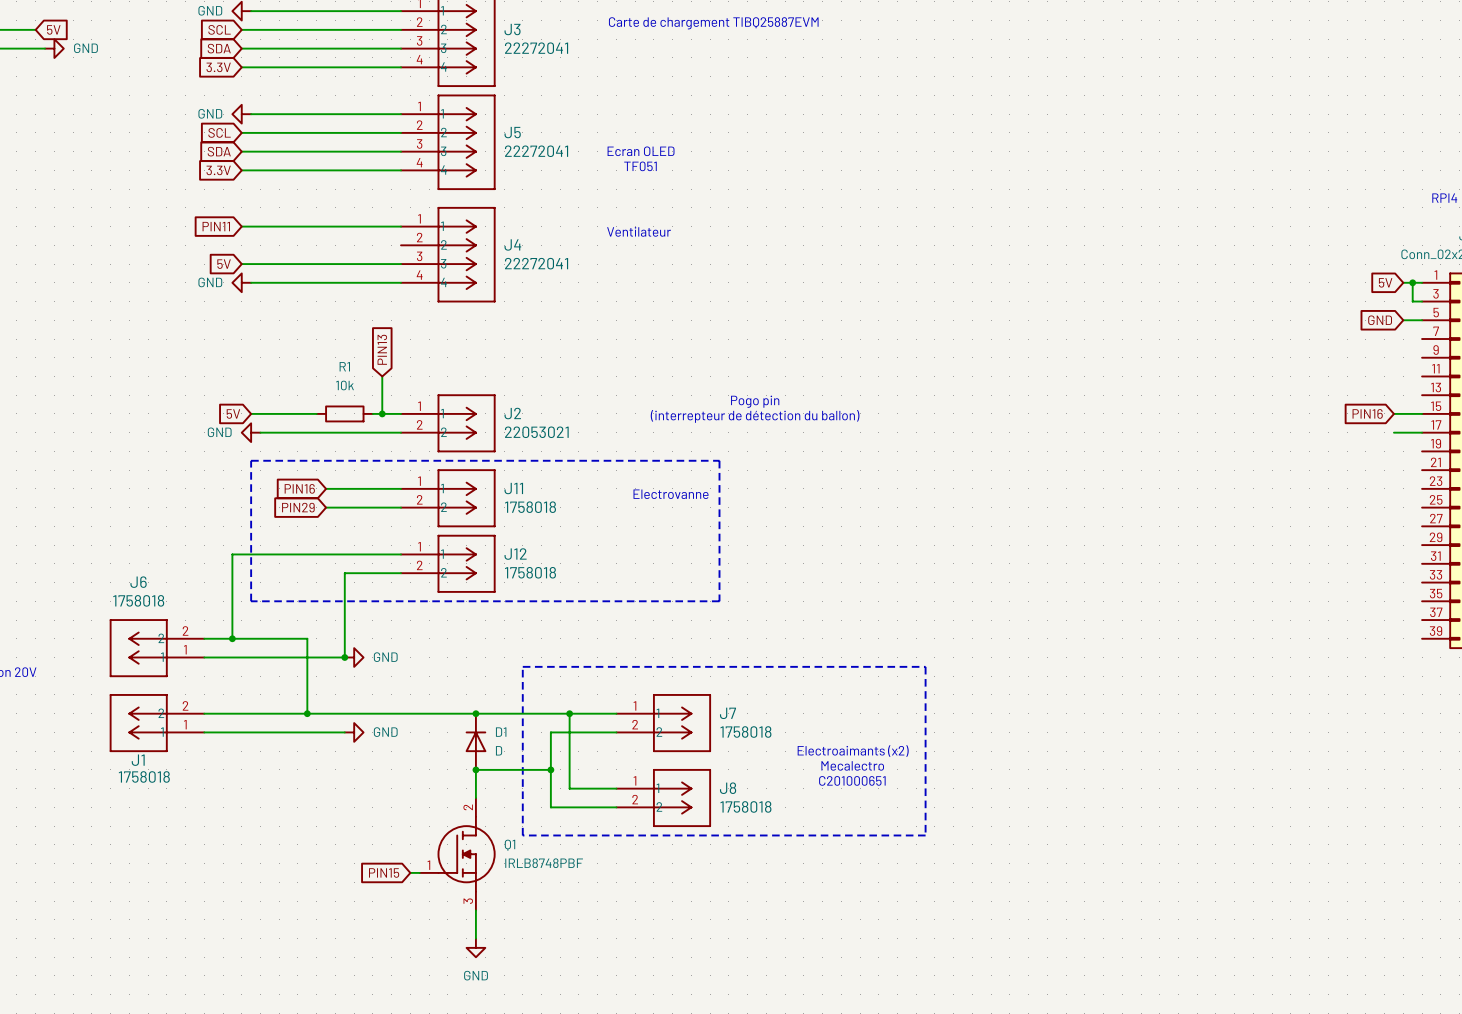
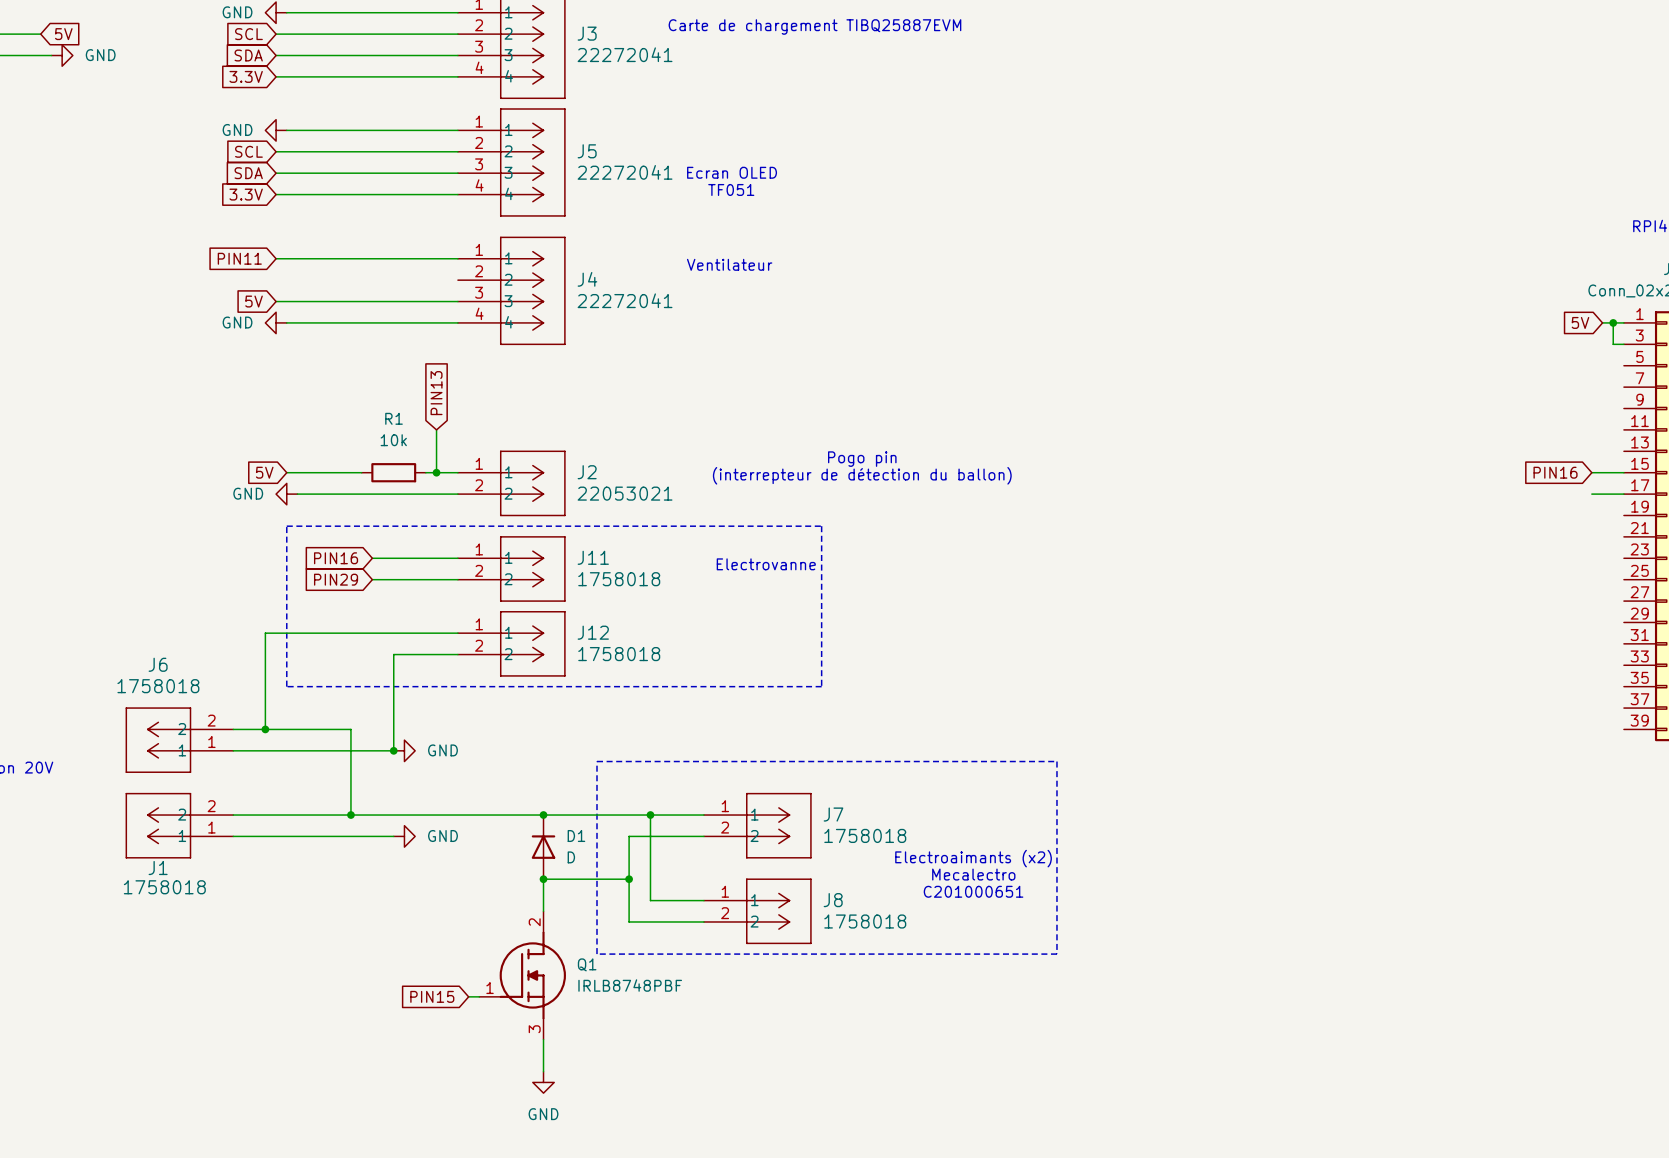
global label: GND (1380, 320) -> none
wire: (1403, 320) (1422, 320) -> none

